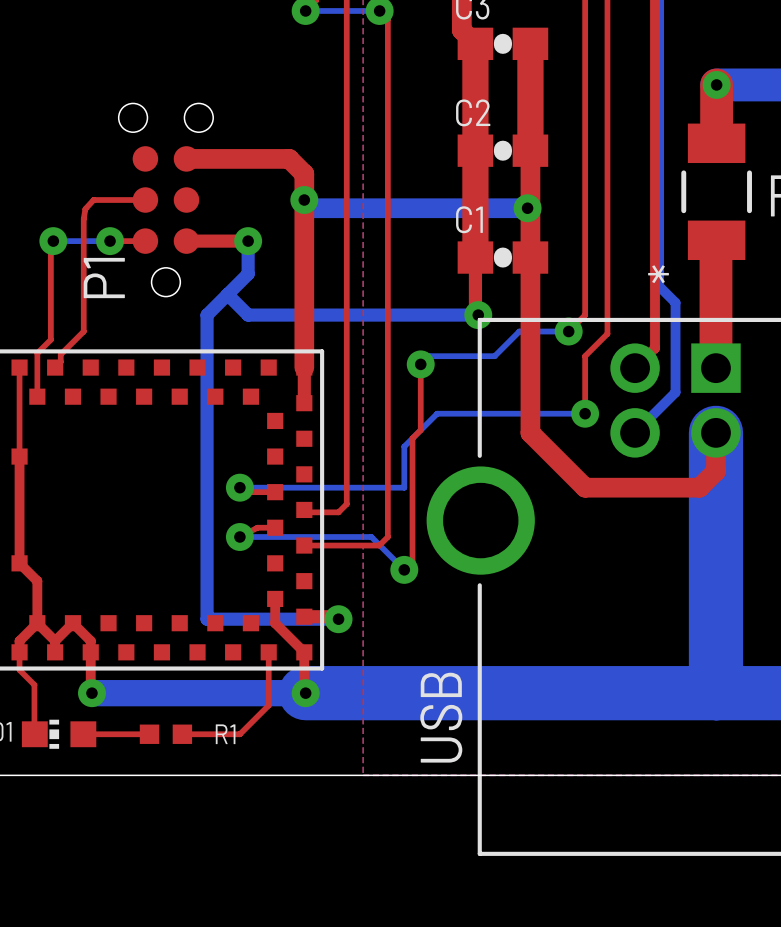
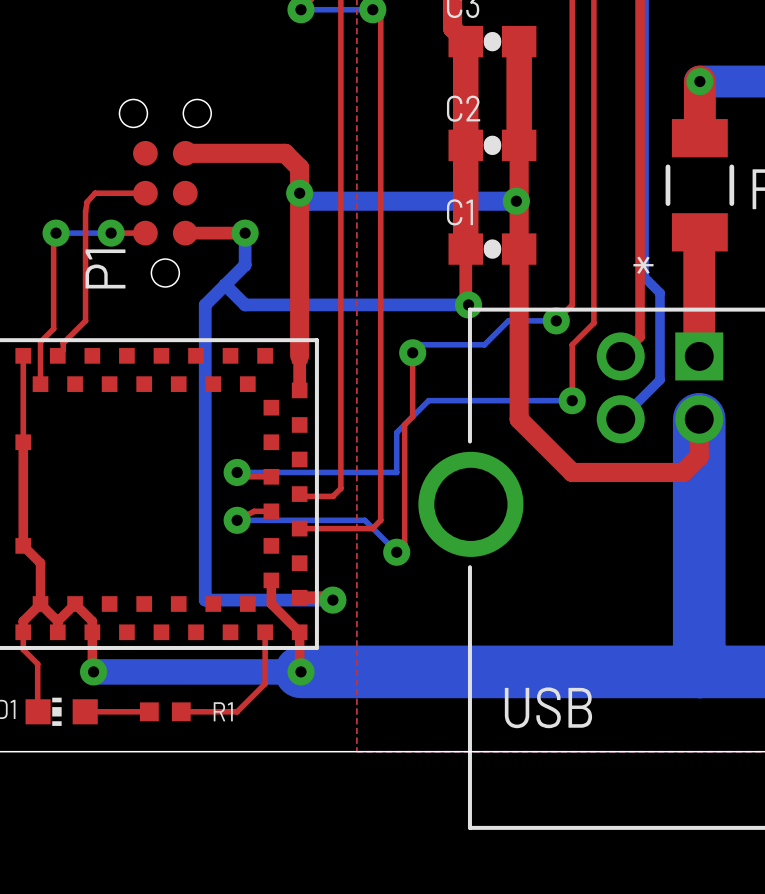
text rotation: 0° (441, 717) -> 90° clockwise (548, 707)
text position: USB (441, 717) -> USB (548, 707)

